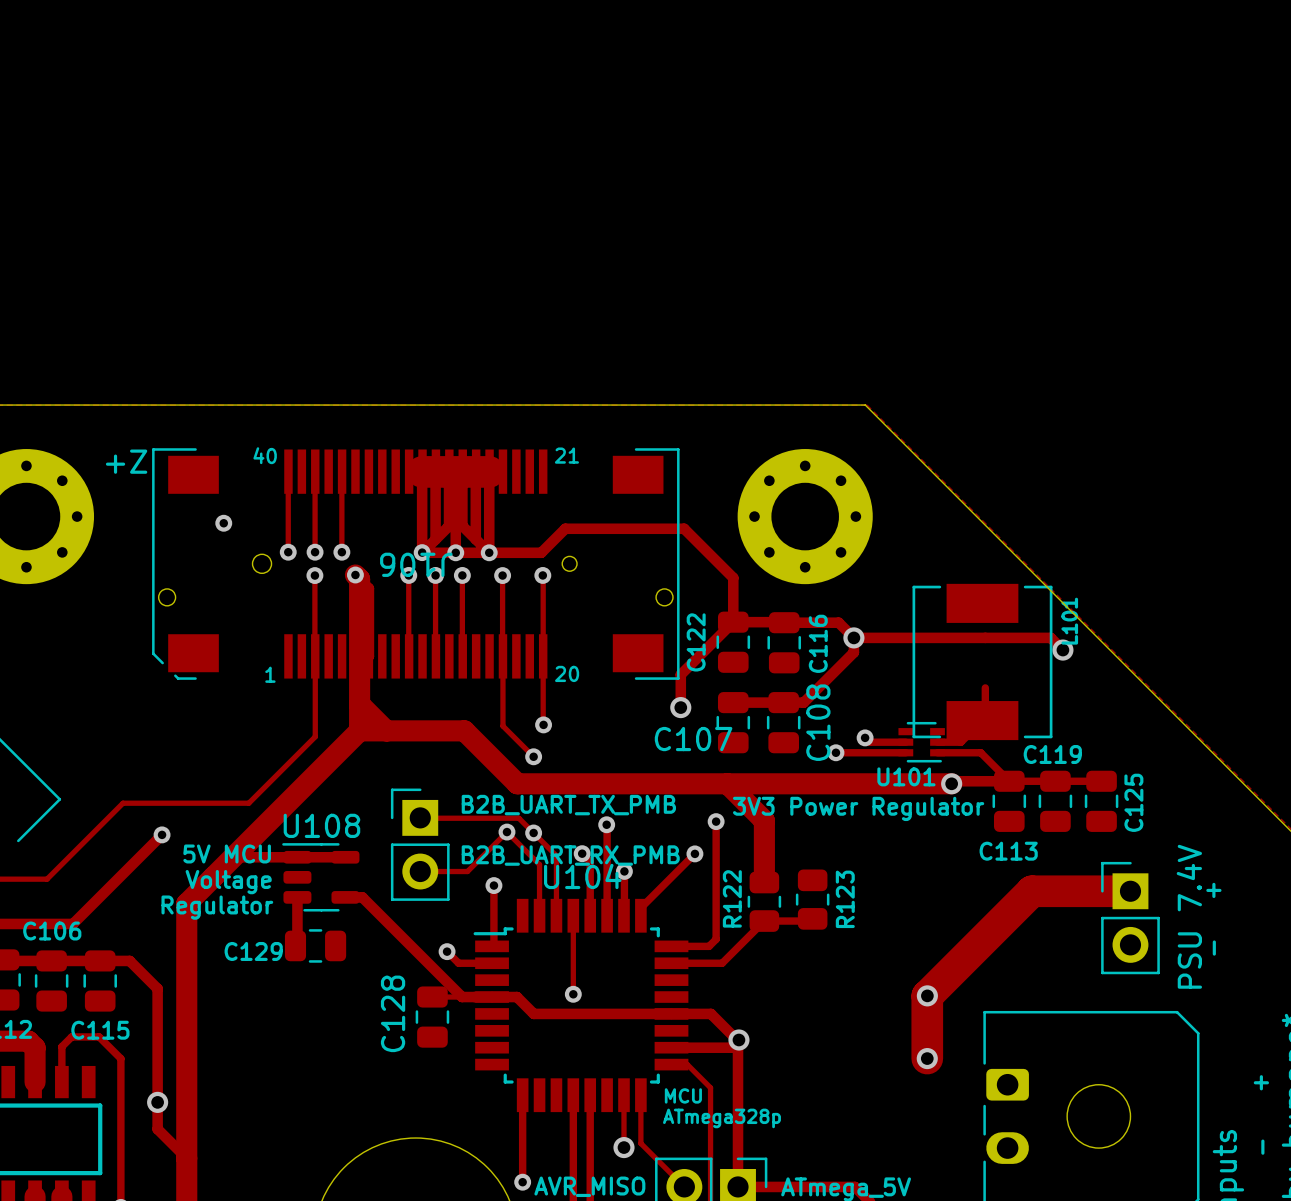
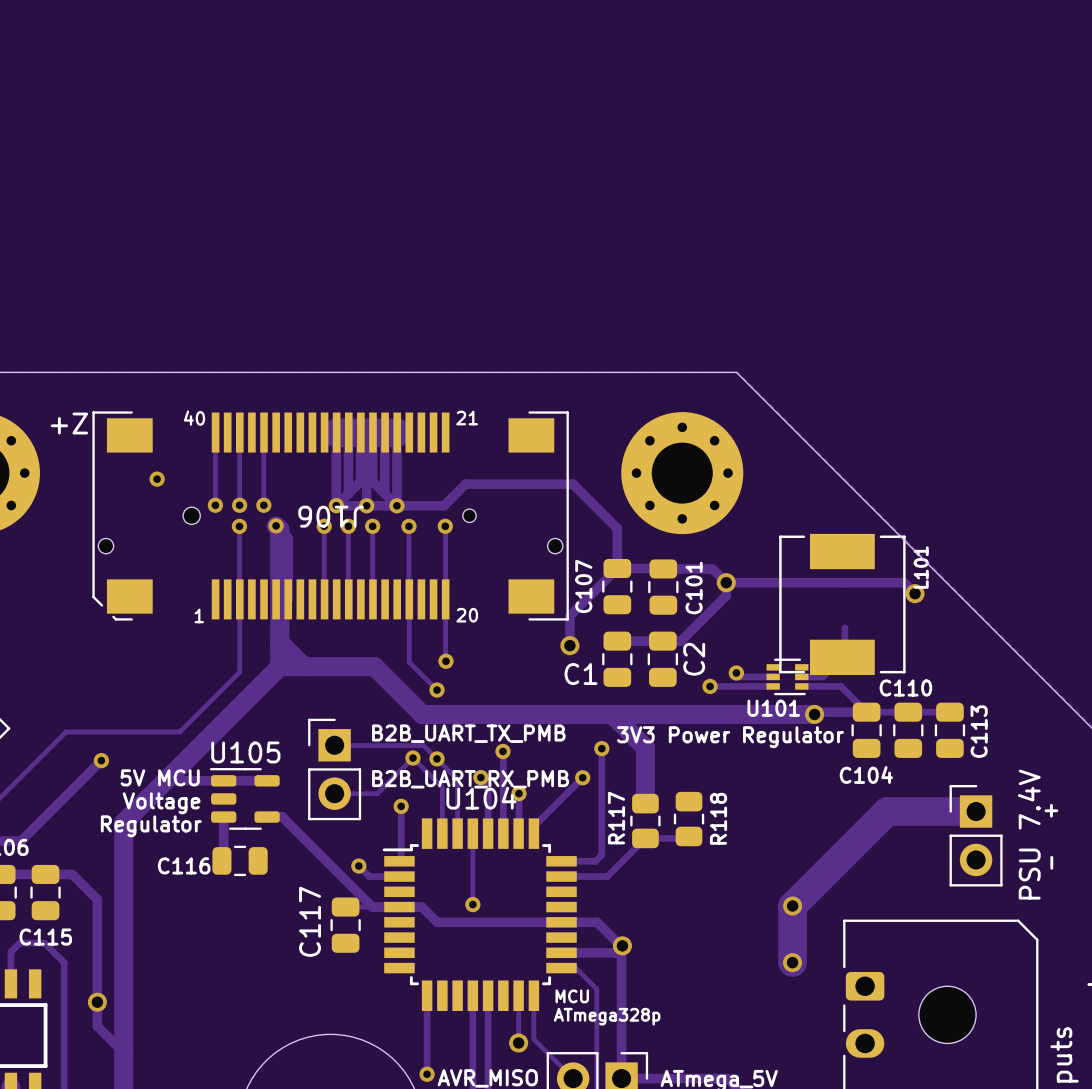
C122 name: C122 (696, 642) -> C107 (583, 586)
C116 name: C116 (818, 643) -> C101 (694, 588)
C108 name: C108 (818, 722) -> C2 (694, 659)
C107 name: C107 (693, 739) -> C1 (581, 674)
C119 name: C119 (1052, 754) -> C110 (905, 688)
C125 name: C125 (1133, 802) -> C113 (979, 731)
U108 name: U108 (321, 825) -> U105 (245, 752)
C113 name: C113 (1008, 851) -> C104 (866, 774)
R122 name: R122 (732, 898) -> R117 (616, 818)
R123 name: R123 (845, 899) -> R118 (718, 818)
C129 name: C129 (253, 951) -> C116 (184, 865)
C128 name: C128 (393, 1013) -> C117 (310, 921)

